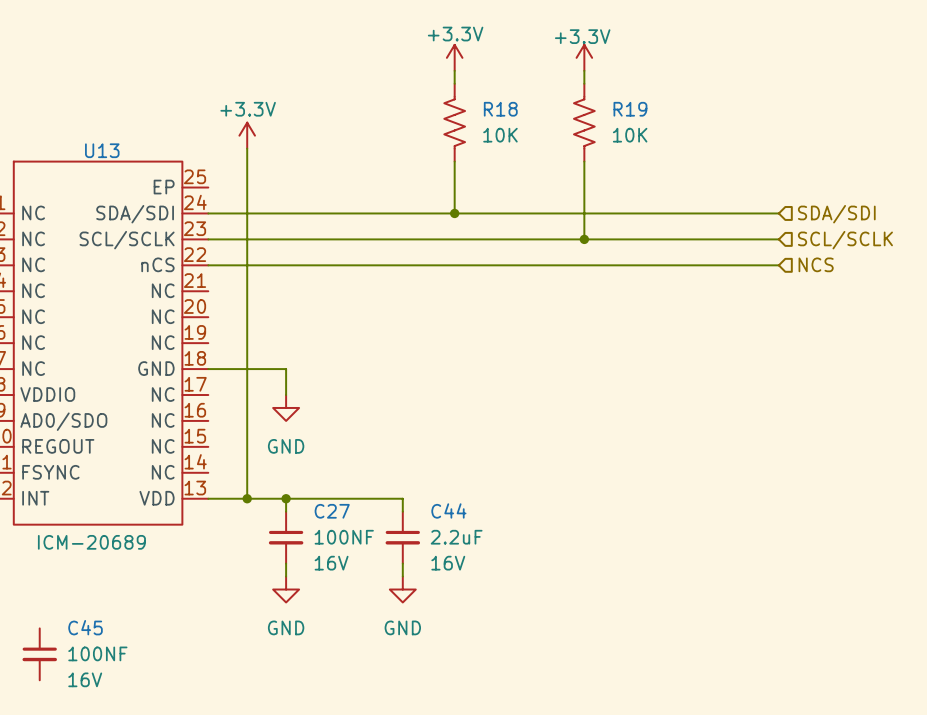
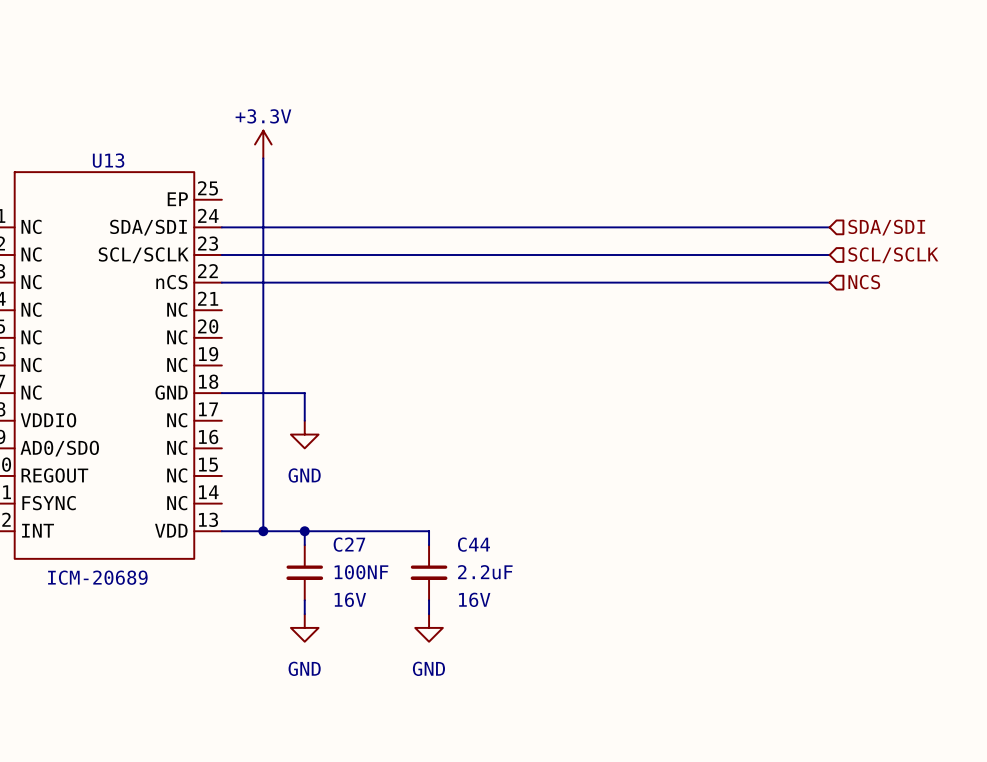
power symbol: +3.3V (454, 57) -> none
power symbol: +3.3V (584, 57) -> none
wire: (454, 70) (454, 83) -> none
wire: (584, 70) (584, 83) -> none
R18: 10K (454, 122) -> none
R19: 10K (584, 122) -> none
wire: (454, 161) (454, 213) -> none
wire: (584, 161) (584, 239) -> none
junction: (454, 213) -> none
junction: (584, 239) -> none
C45: 100NF (39, 654) -> none

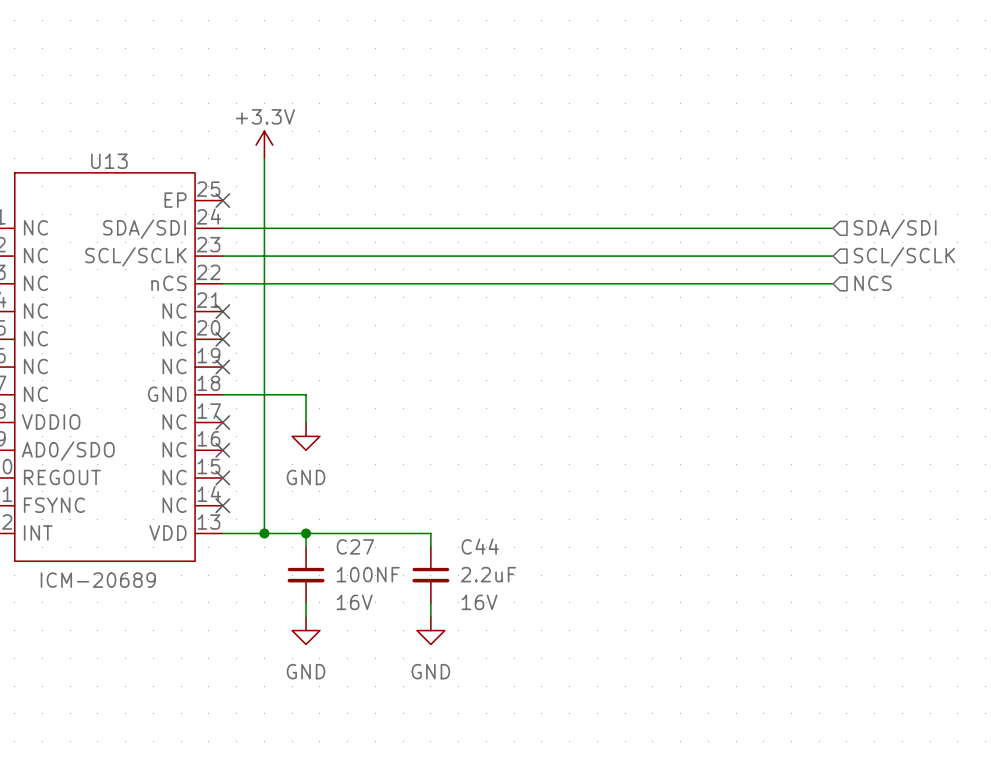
no-connect mark: none -> (222, 200)
no-connect mark: none -> (222, 311)
no-connect mark: none -> (222, 339)
no-connect mark: none -> (222, 367)
no-connect mark: none -> (222, 422)
no-connect mark: none -> (222, 450)
no-connect mark: none -> (222, 478)
no-connect mark: none -> (222, 505)

